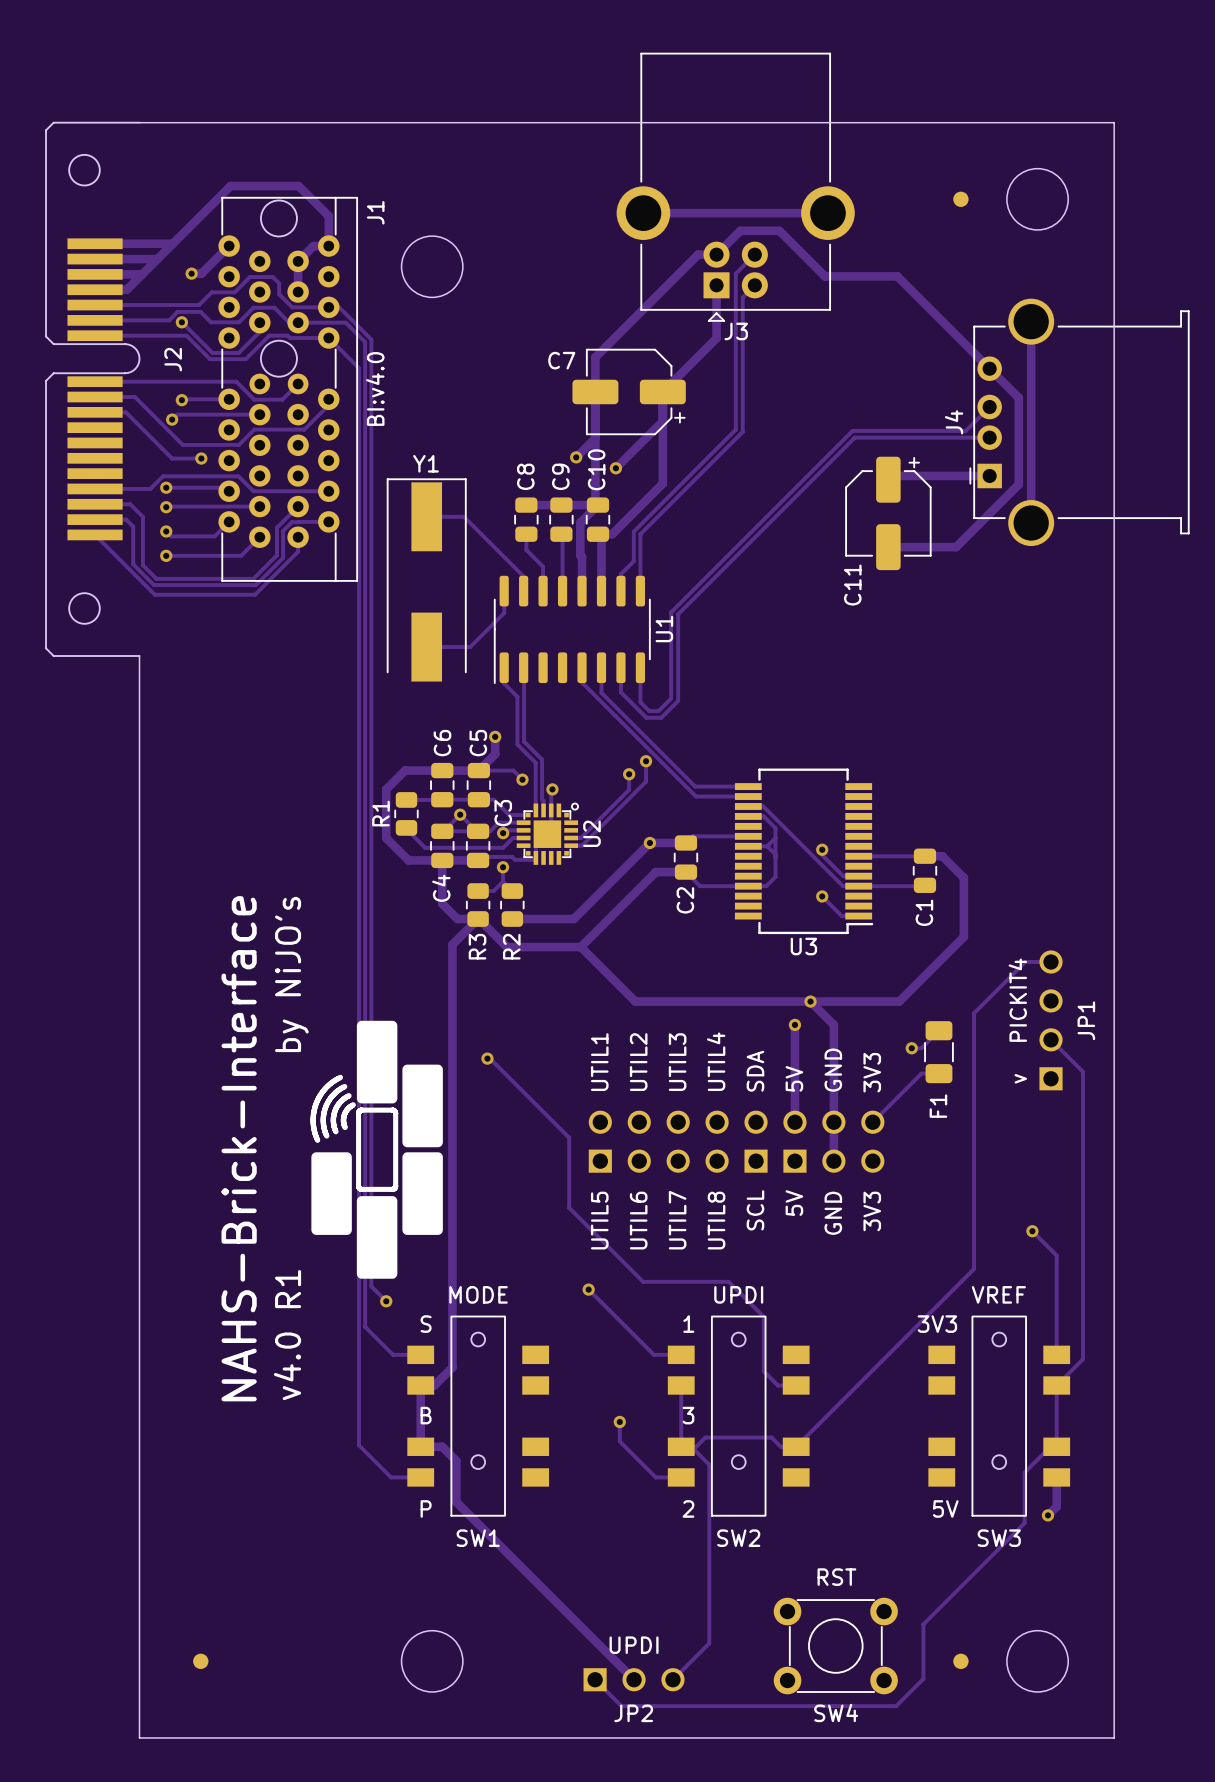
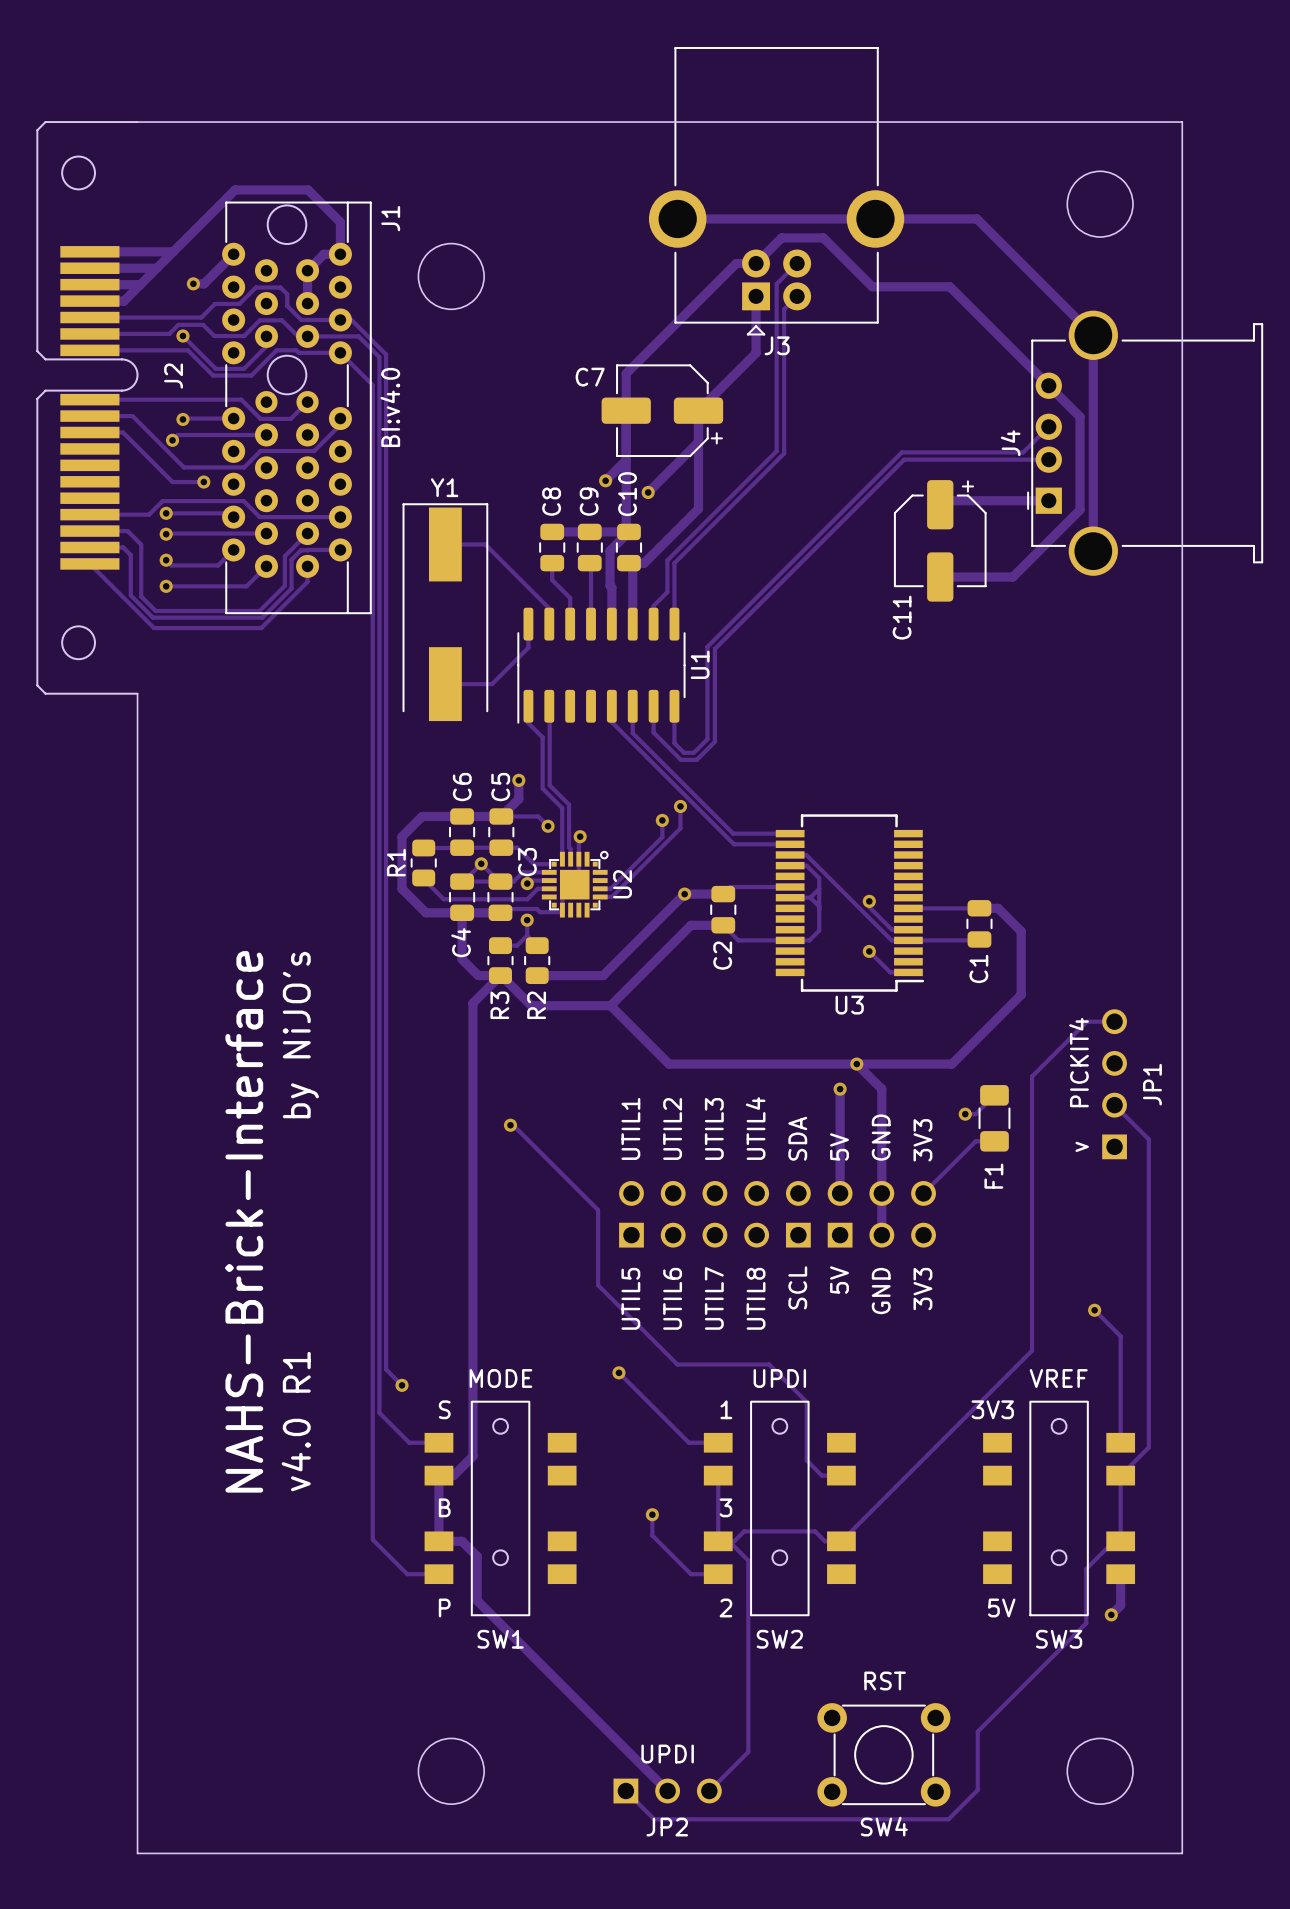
part: (960, 199) -> none
track: none -> (875, 218) (977, 218) (1093, 335)
drawing: [310, 1020, 443, 1279] -> none
part: (200, 1661) -> none
part: (960, 1661) -> none

